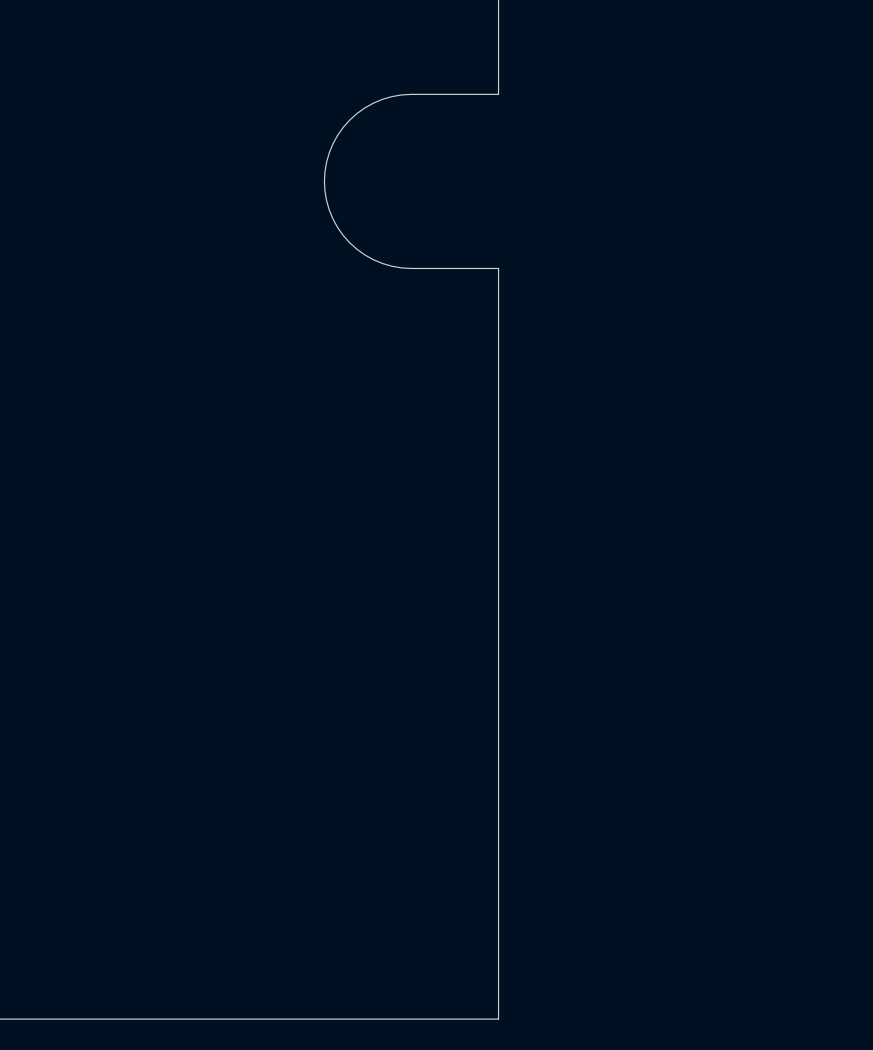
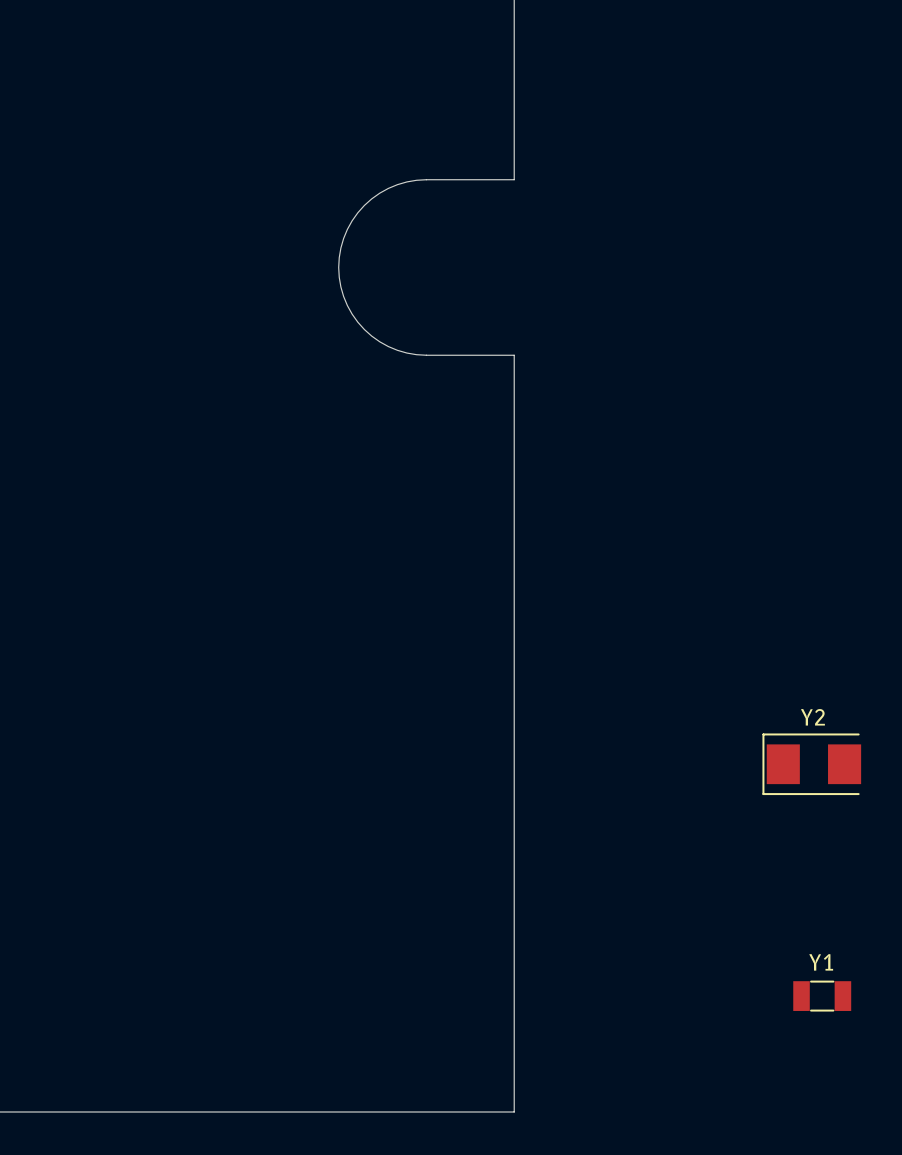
Y2: none -> (811, 764)
Y1: none -> (822, 996)

